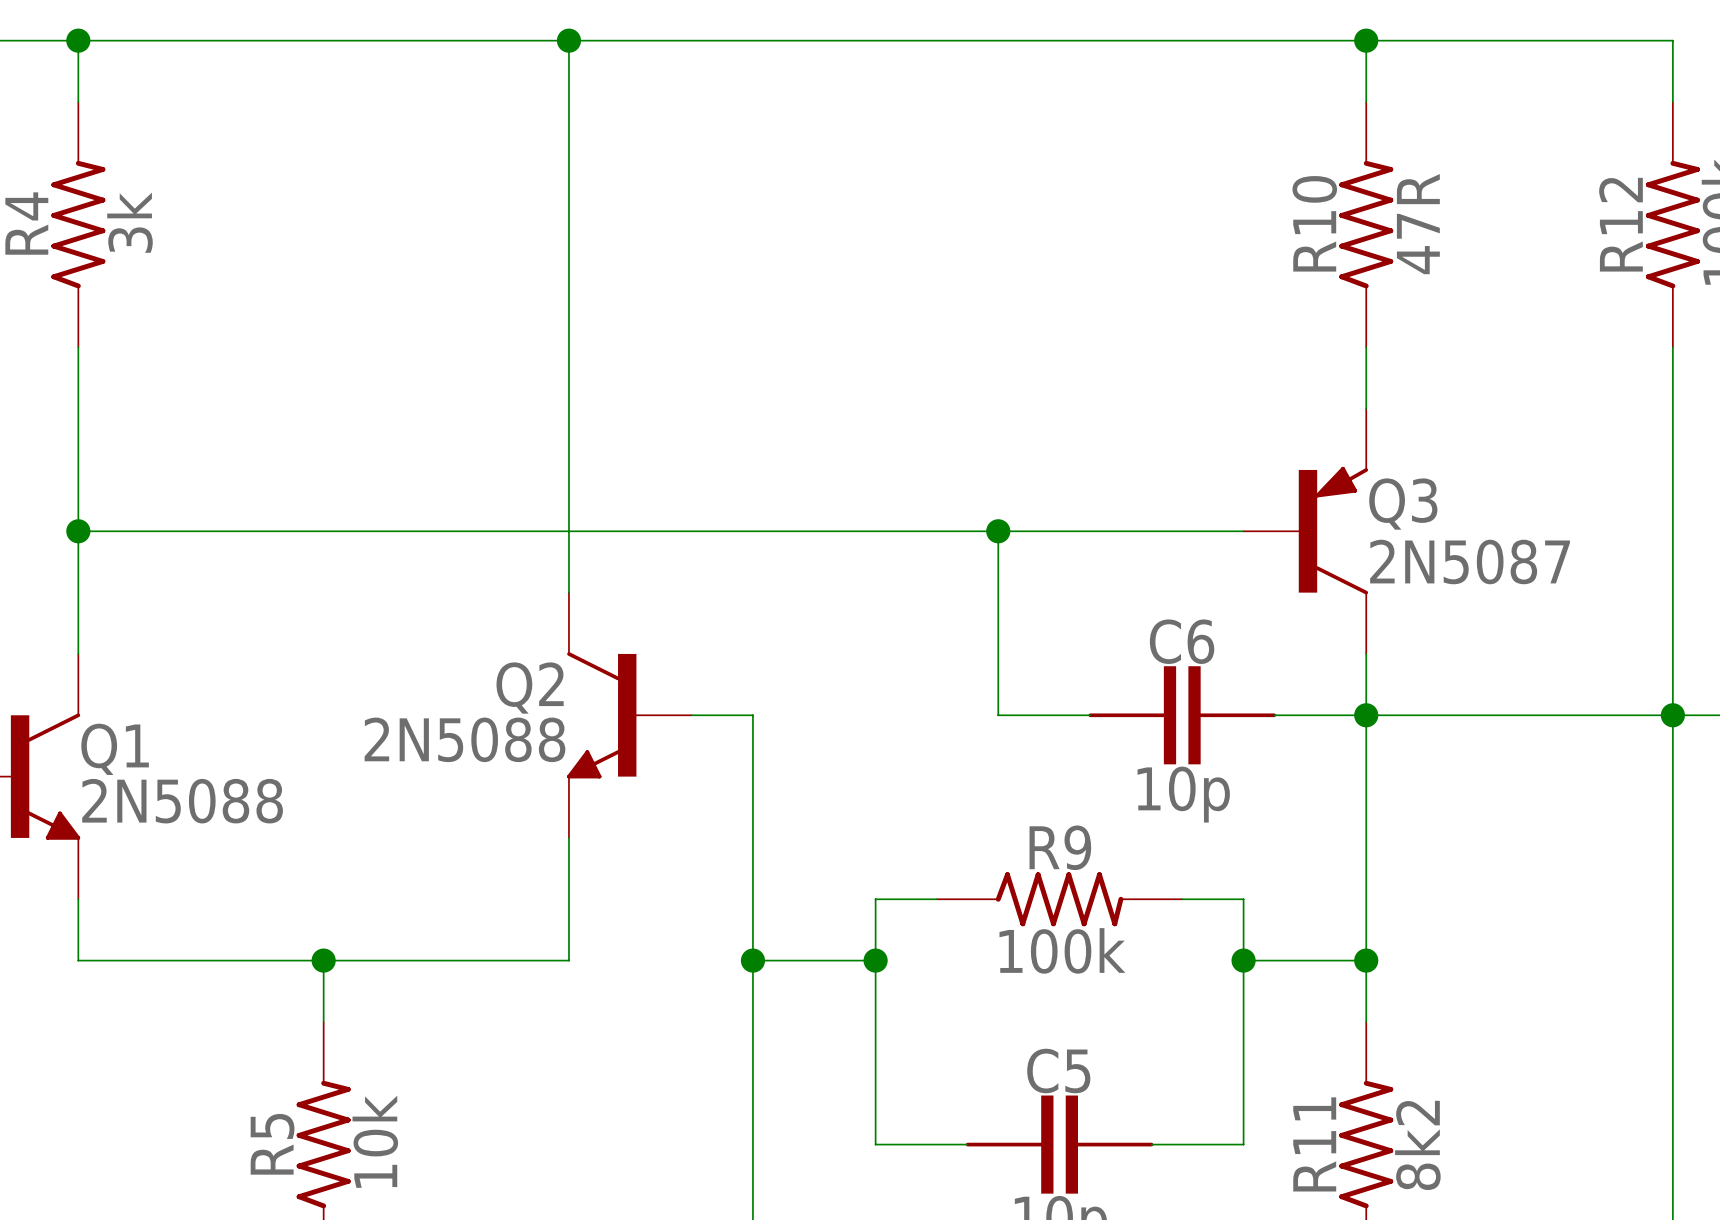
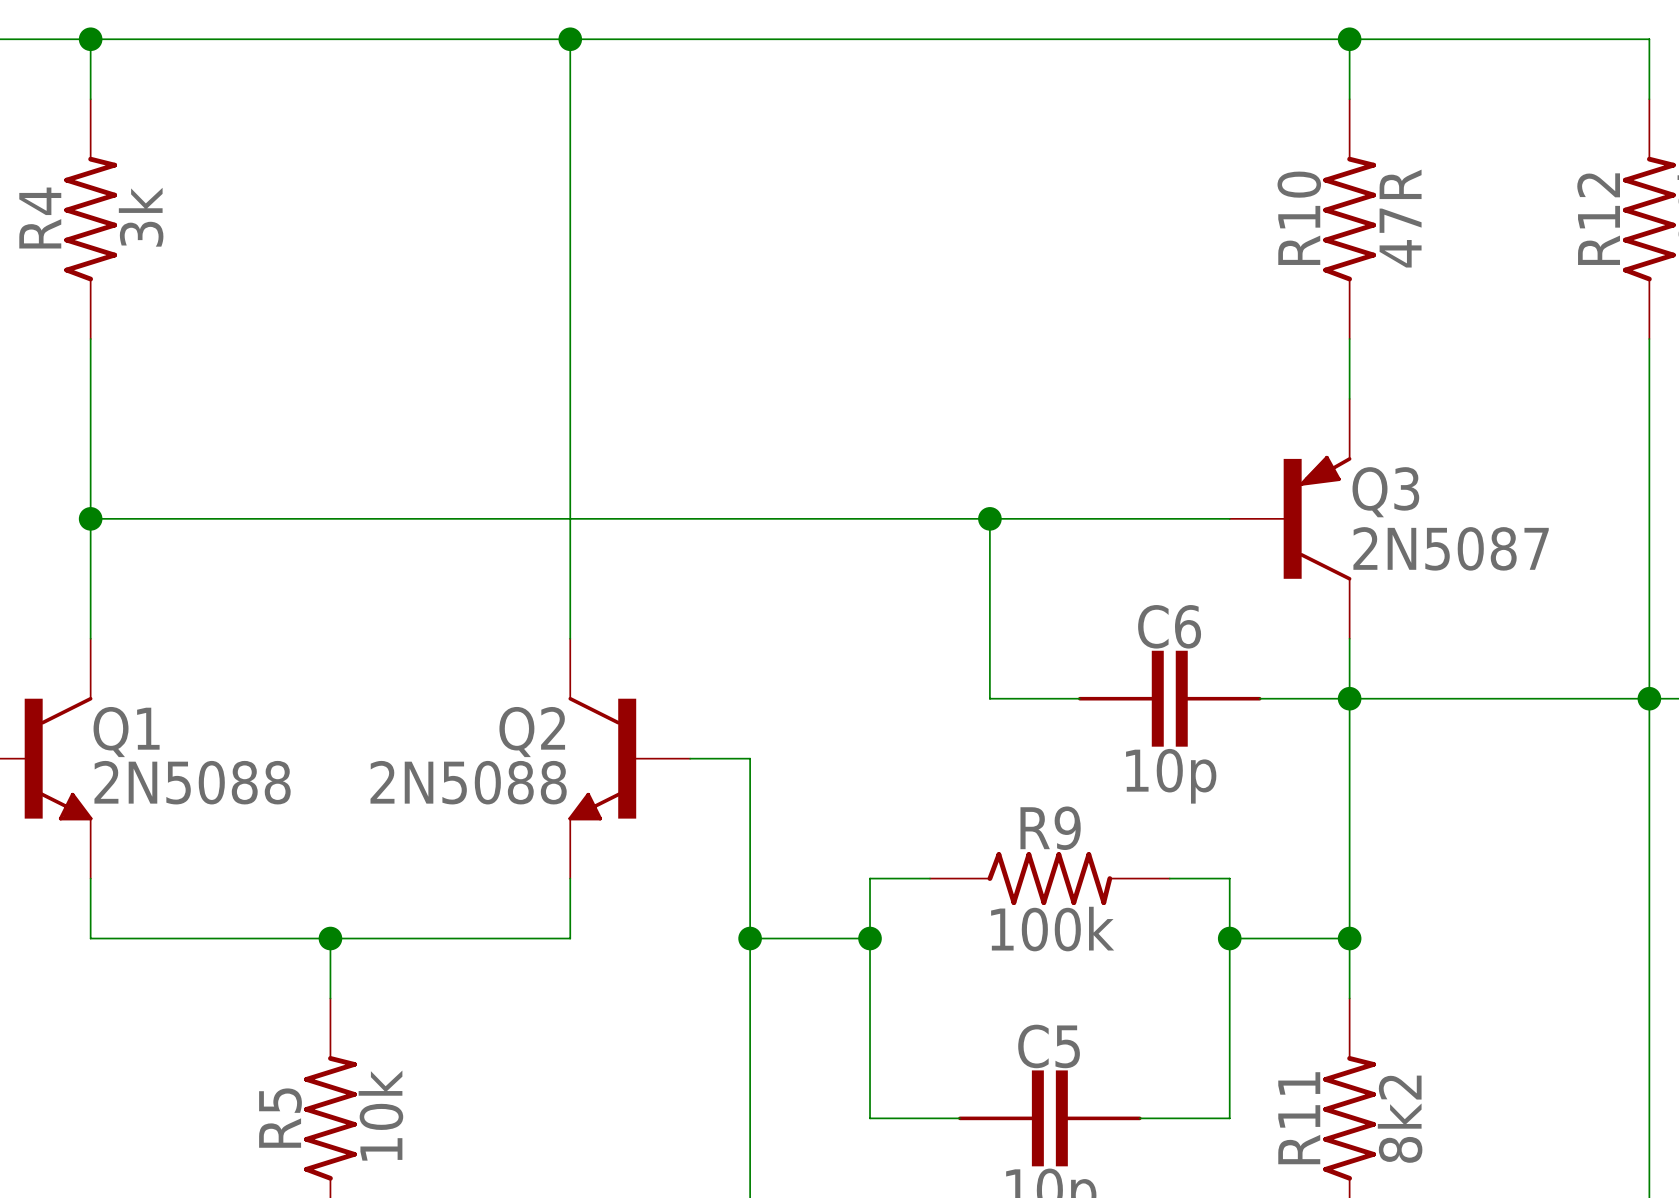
Q2 position: (629, 715) -> (629, 758)
wire: (691, 715) (752, 715) (752, 776) -> (690, 758) (750, 758)

